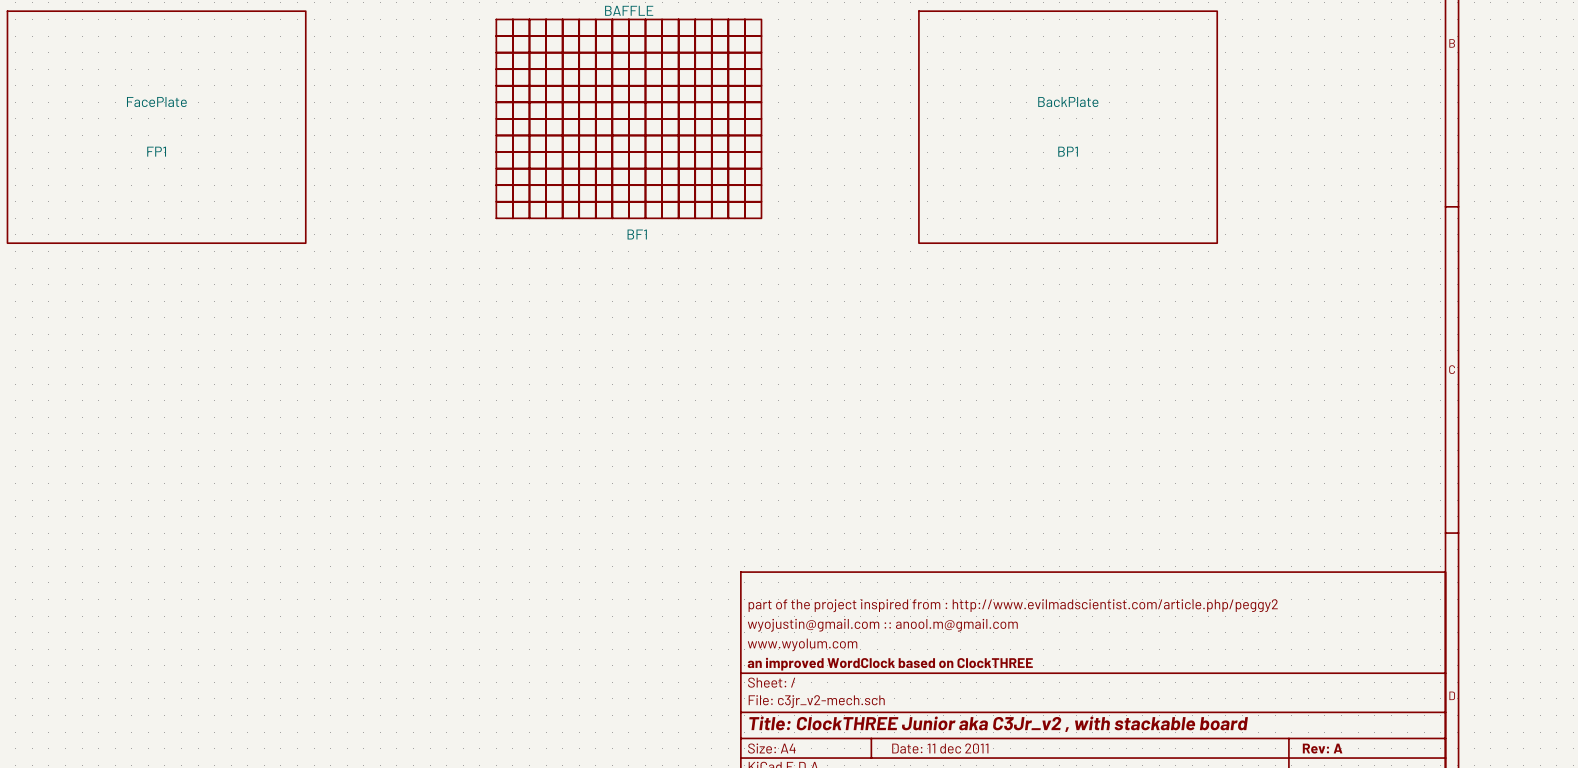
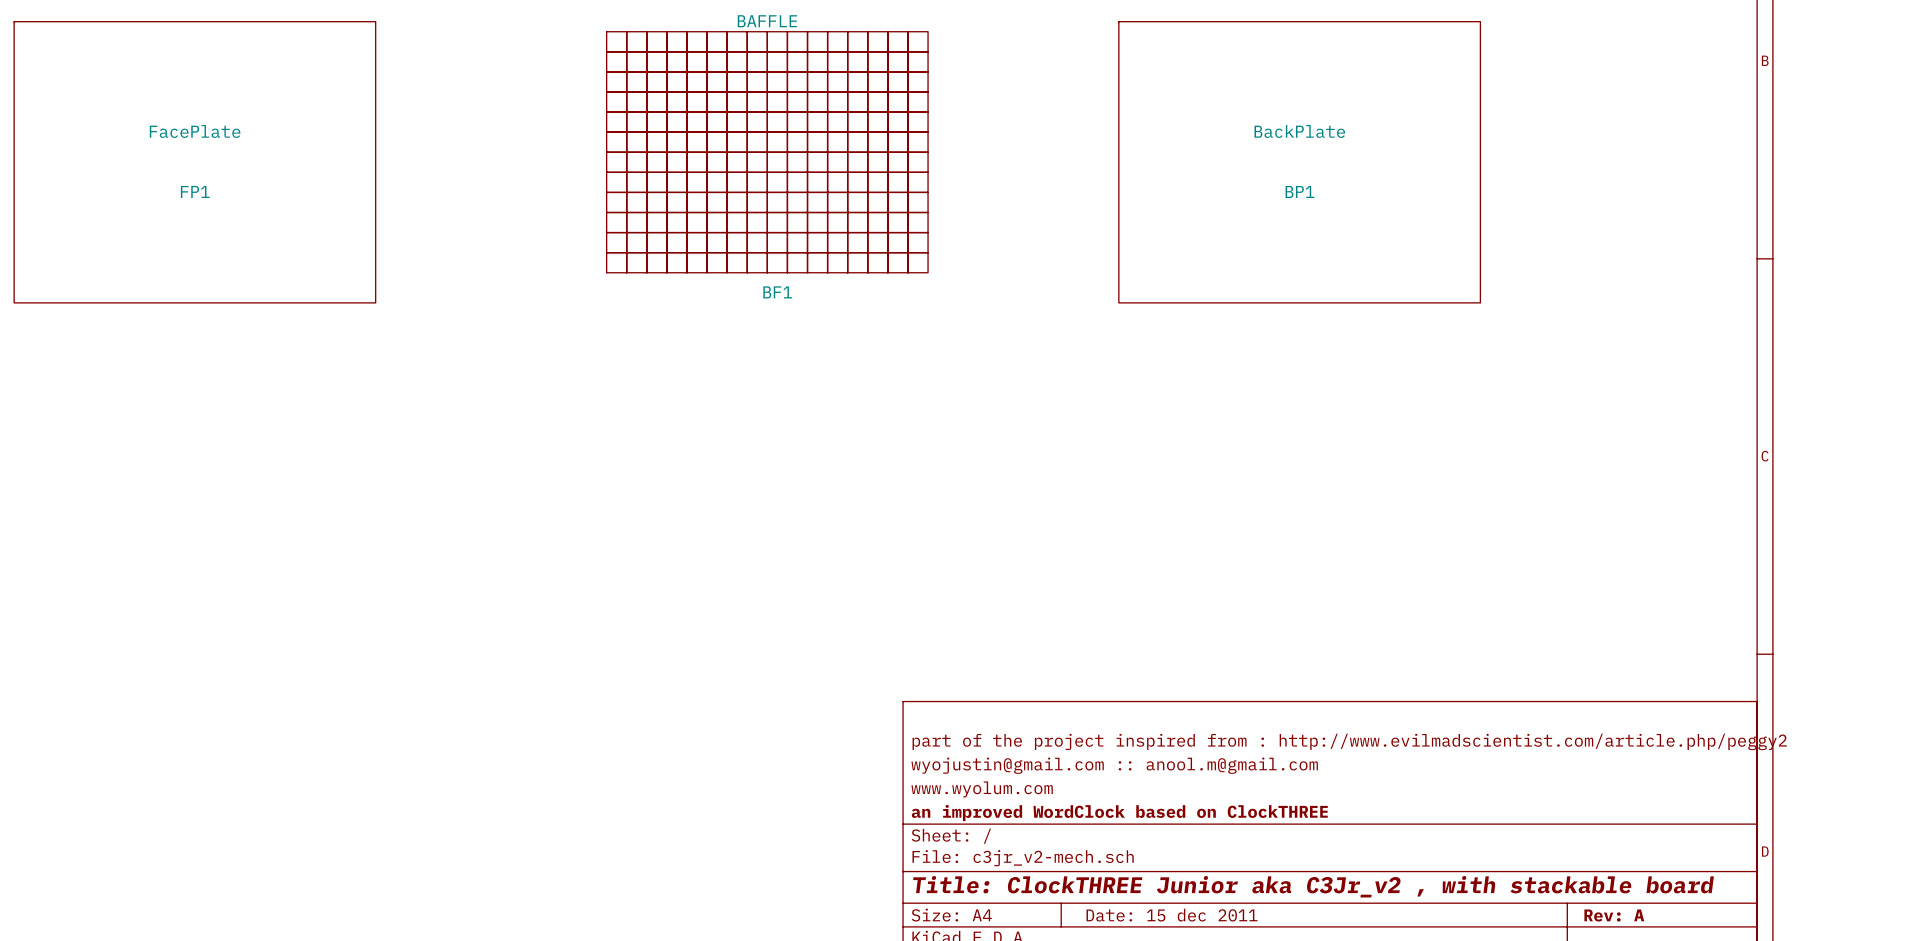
title block: Date: 11 dec 2011 (940, 748) -> Date: 15 dec 2011 (1172, 915)

